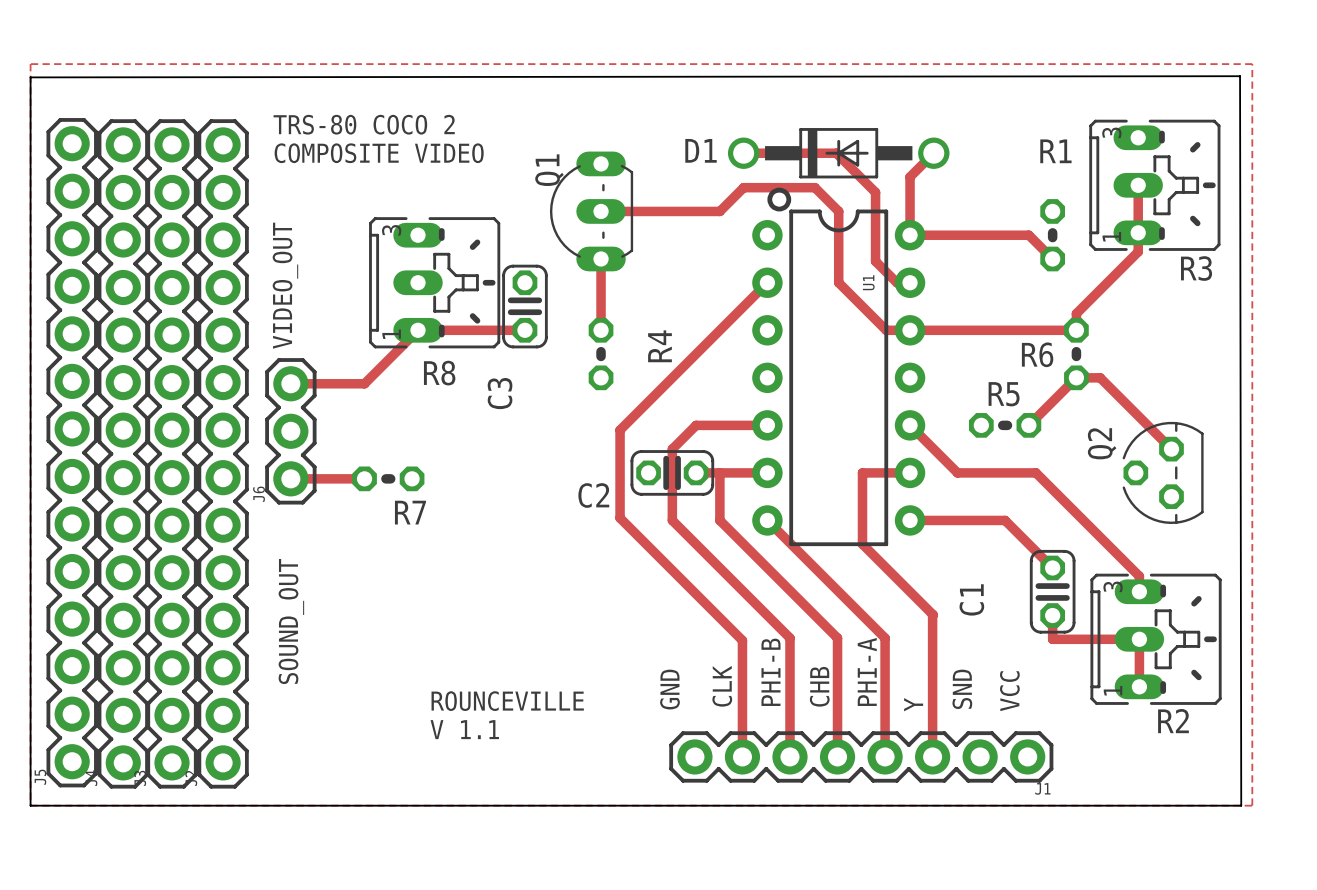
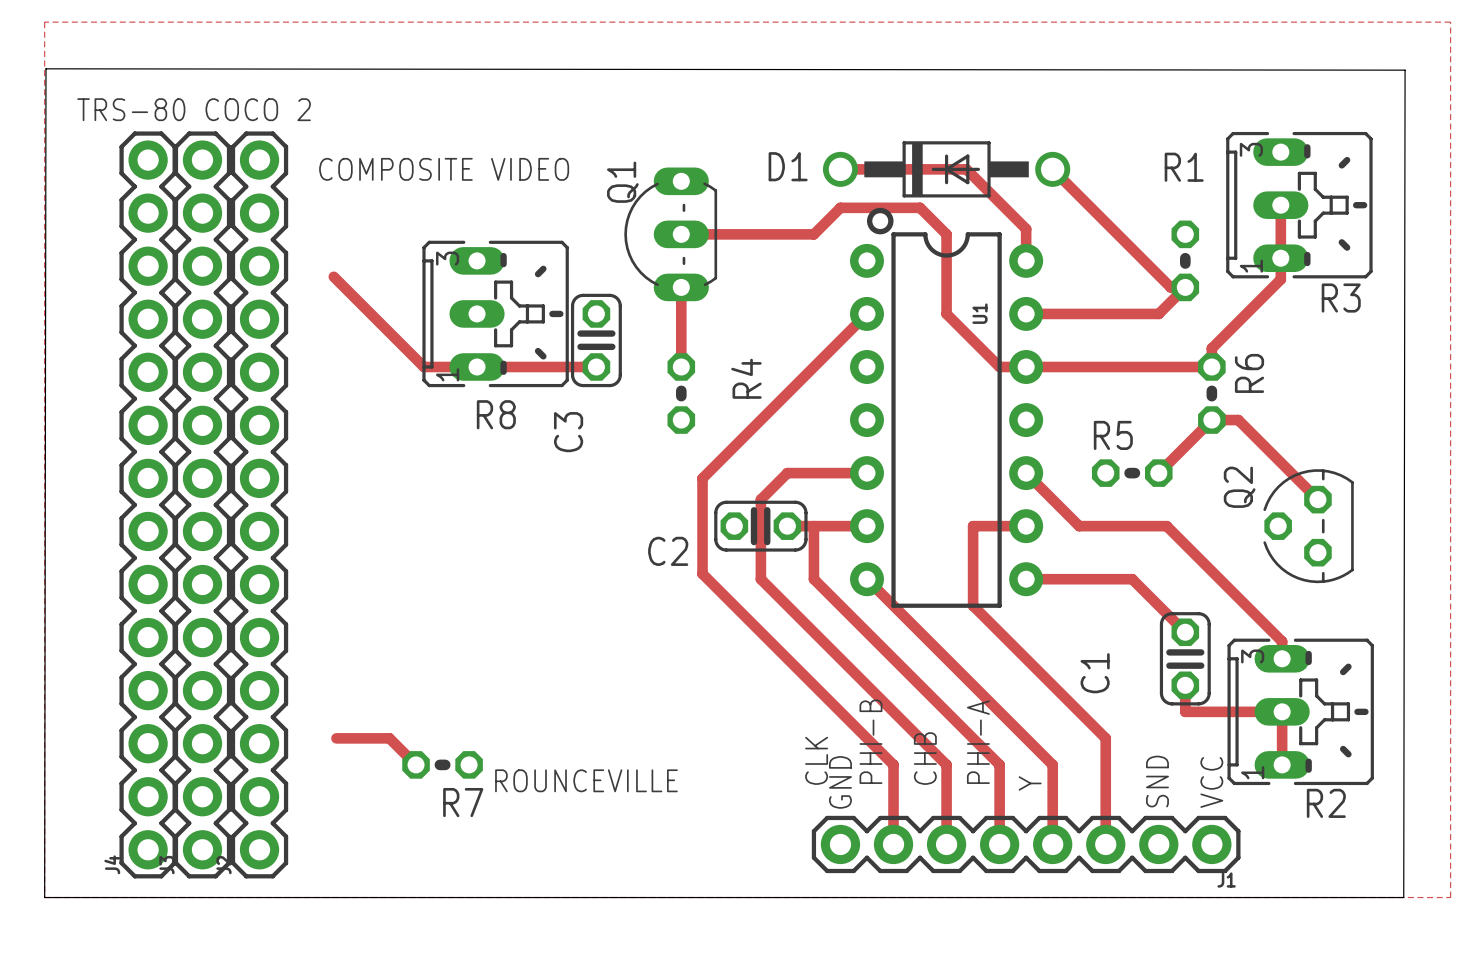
zone outline: (30, 64) (1252, 64) (1252, 805) -> (44, 69) (44, 22) (1450, 22) (1450, 897) (1408, 897)
text position: TRS-80 COCO 2 (364, 124) -> TRS-80 COCO 2 (194, 109)
track: (836, 153) (875, 192) (875, 261) (896, 282) (910, 282) -> (943, 169) (966, 169) (1026, 229)
track: (933, 153) (910, 176) (910, 206) -> (1052, 169) (1170, 287) (1185, 287) (1158, 313) (1026, 313)
track: (910, 235) (1028, 235) (1052, 258) -> none
text: VIDEO_OUT (285, 285) -> none
track: (418, 330) (364, 383) (290, 383) -> (477, 366) (423, 366) (333, 276)
R6 name rotation: 0° (1037, 354) -> 90° counterclockwise (1249, 373)
R6 name position: R6 (1037, 354) -> R6 (1249, 373)
R5 name position: R5 (1004, 394) -> R5 (1113, 435)
J6: (290, 431) -> none
J5: (72, 452) -> none
track: (290, 478) (364, 478) -> none
R7 position: (388, 478) -> (442, 764)
track: (620, 515) (620, 518) (742, 640) (742, 756) -> (702, 573) (893, 764) (893, 844)
track: (933, 614) (932, 756) -> (1052, 684) (1105, 738) (1105, 844)
text: SOUND_OUT (291, 621) -> none
track: (790, 638) (790, 756) -> (892, 710) (946, 764) (946, 844)
track: (837, 638) (837, 756) -> (945, 710) (999, 764) (999, 844)
track: (885, 638) (885, 756) -> (998, 710) (1052, 764) (1052, 844)
track: none -> (336, 738) (389, 738) (416, 764)
text position: GND (669, 689) -> GND (840, 782)
text position: SND (962, 689) -> SND (1157, 781)
text position: VCC (1009, 691) -> VCC (1211, 782)
text: V 1.1 (464, 729) -> none
J1 position: (861, 756) -> (1026, 844)
board edge: (30, 805) (30, 77) (1240, 76) (1241, 805) -> (44, 897) (45, 68) (1405, 70) (1403, 897) (1395, 897)

